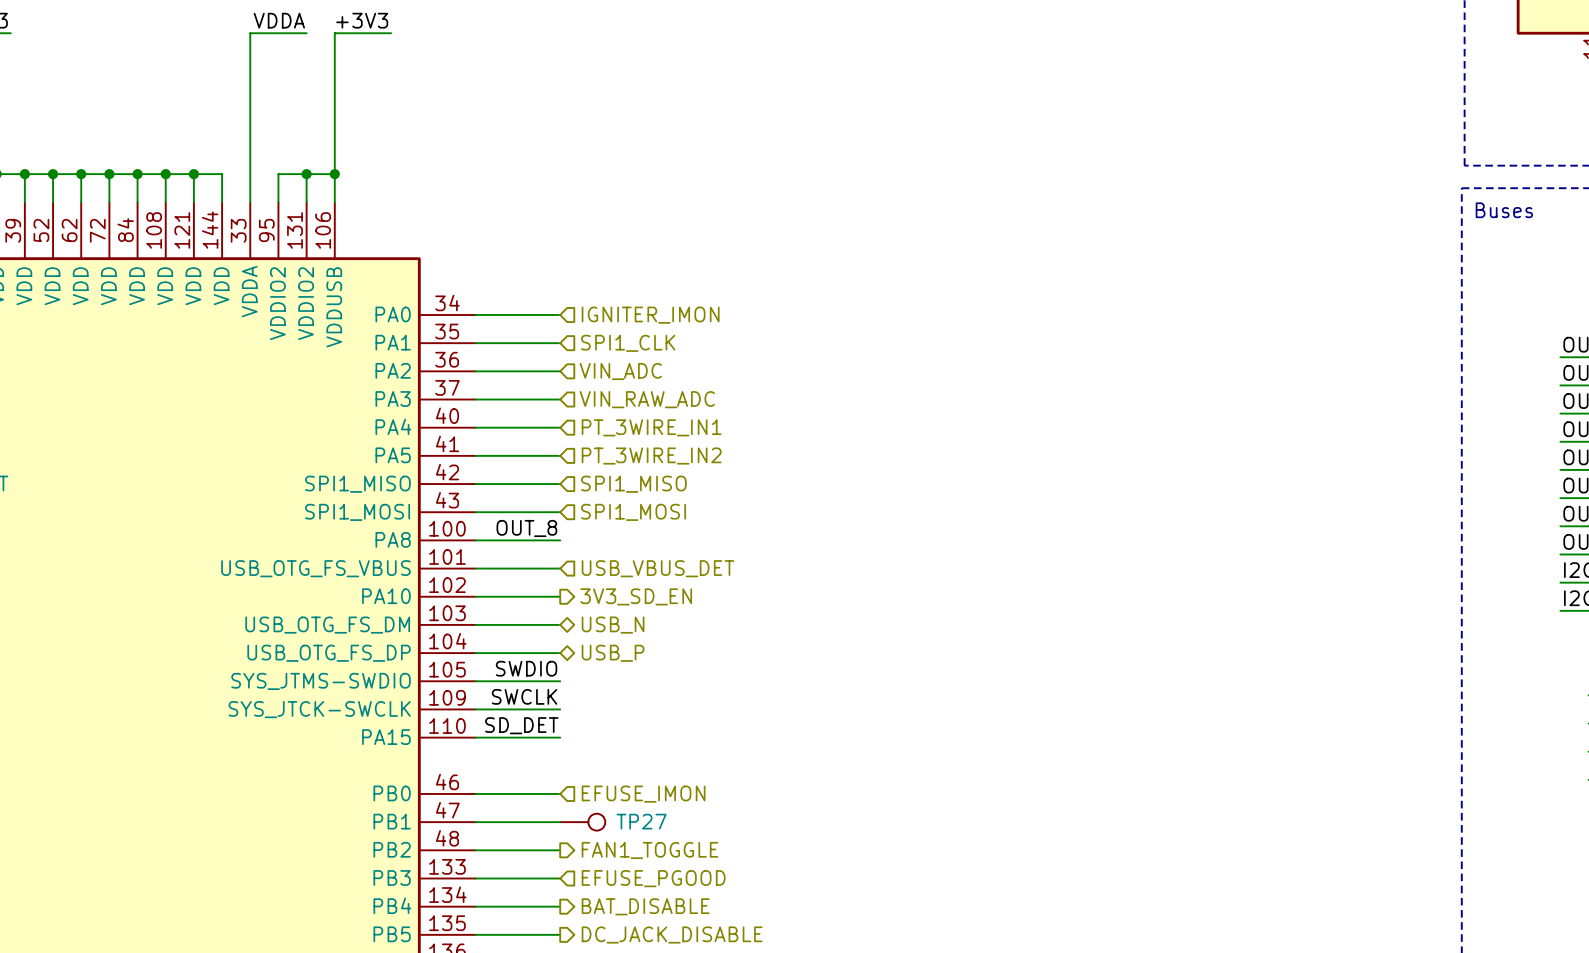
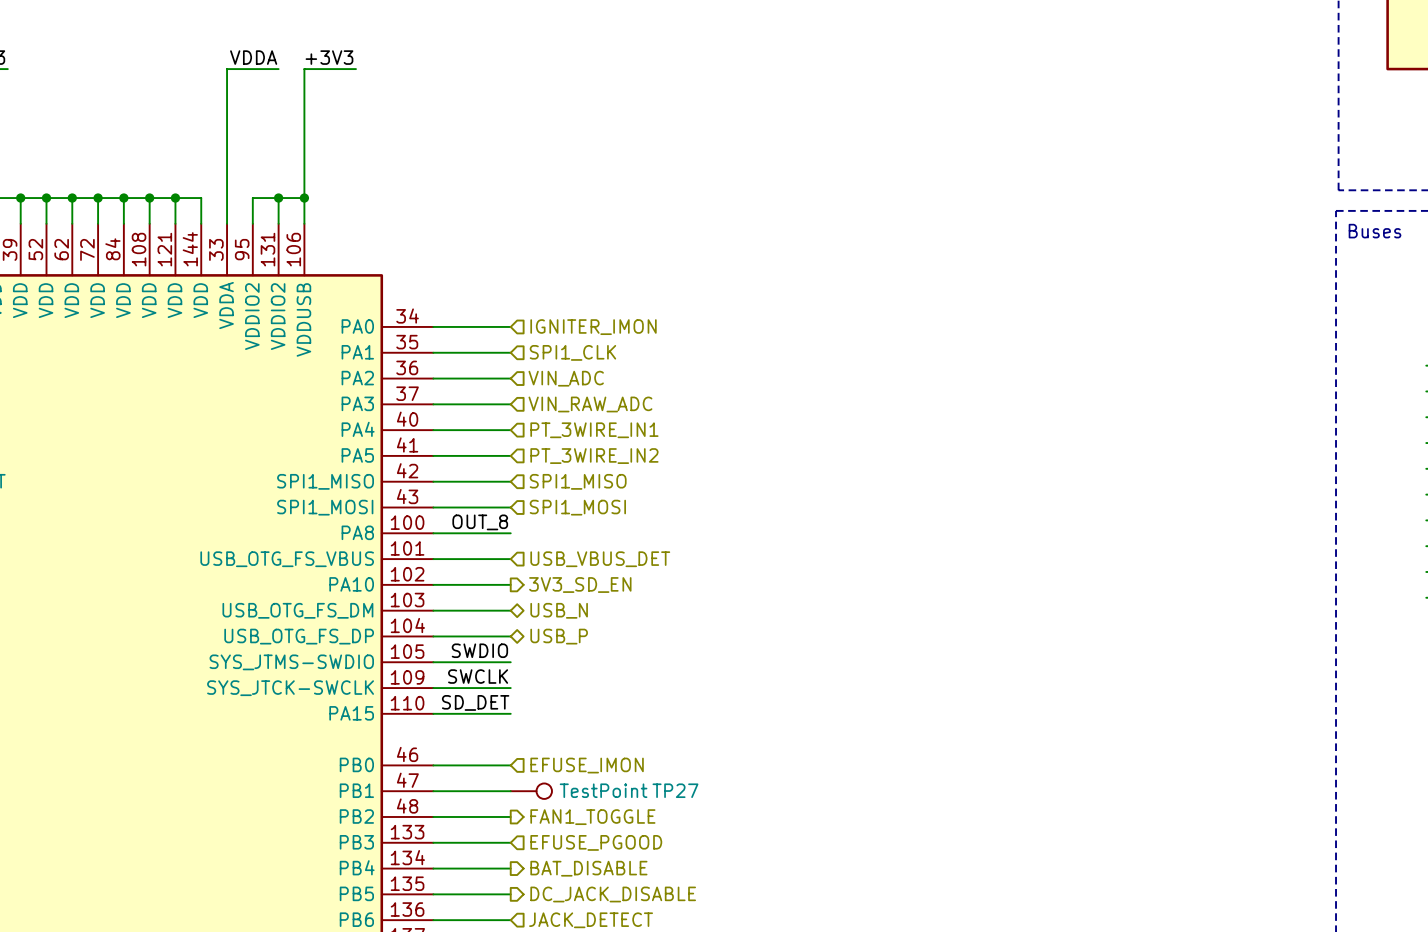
TP27 name position: TP27 (641, 821) -> TP27 (675, 790)
TP27 value: none -> TestPoint (603, 790)

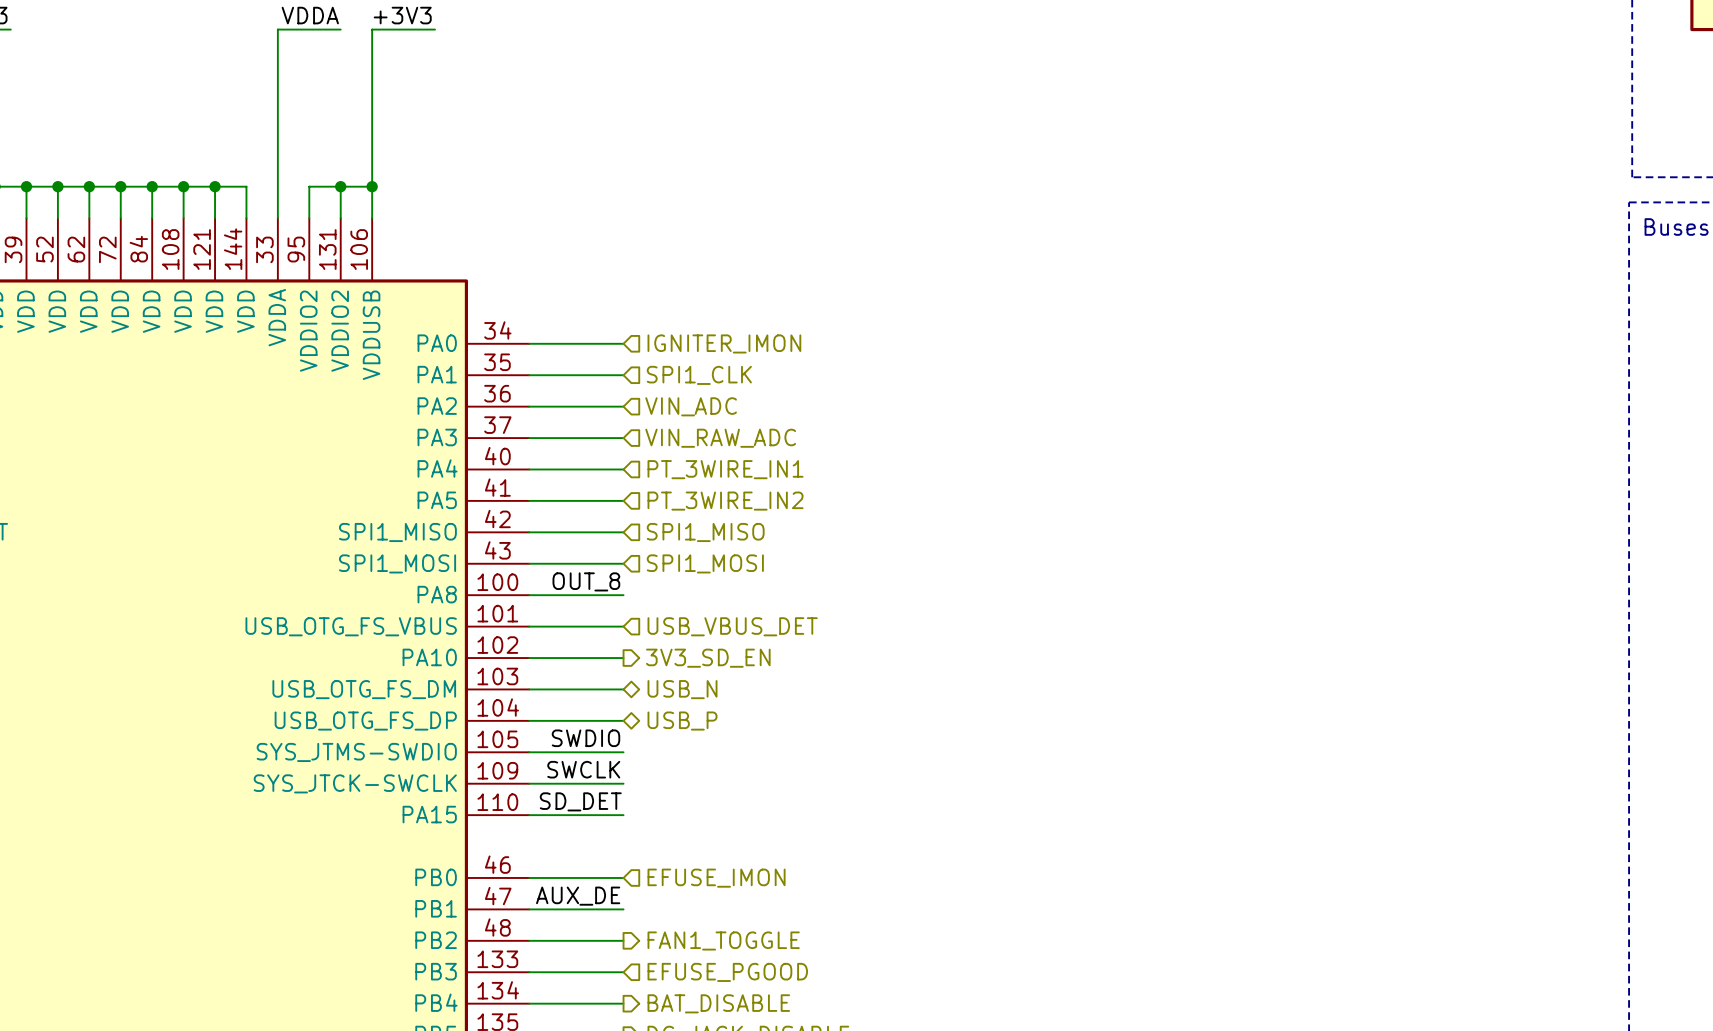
label: none -> AUX_DE (578, 896)
TP27: TestPoint (531, 791) -> none

